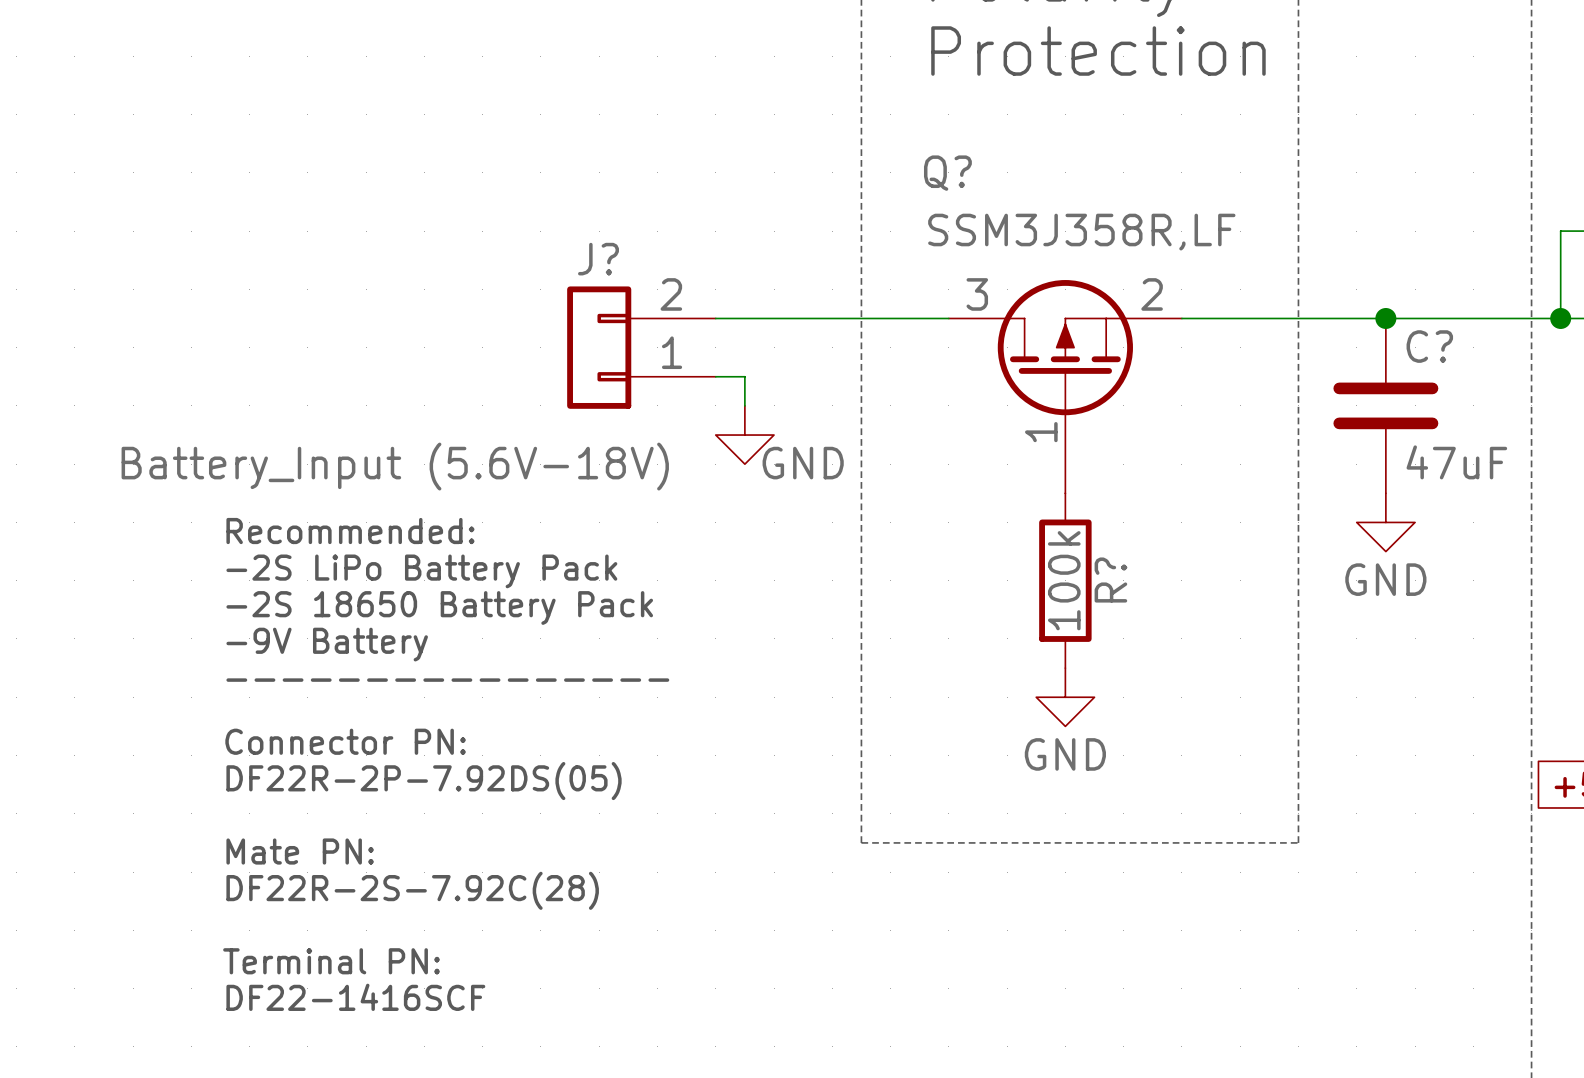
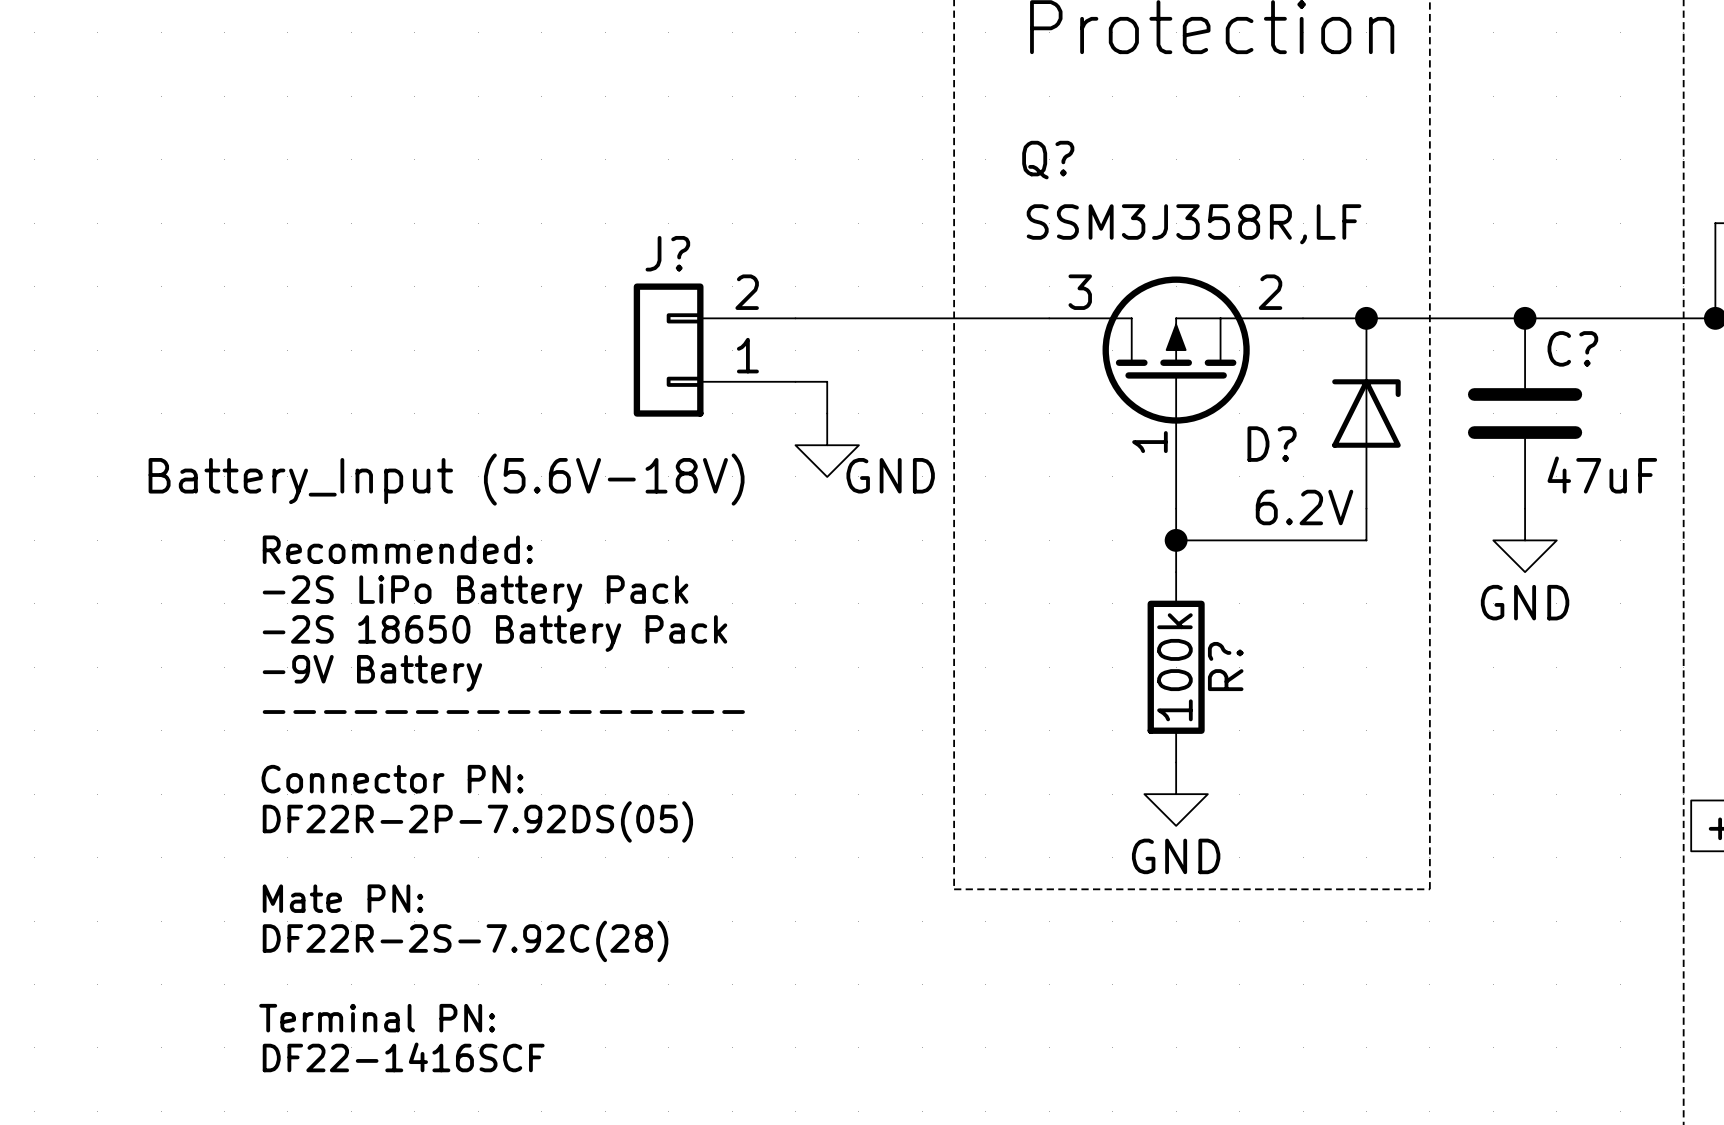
junction: none -> (1366, 318)
D?: none -> 6.2V (1366, 413)
wire: none -> (1366, 508) (1366, 540) (1176, 540)
junction: none -> (1176, 540)
R? position: (1065, 580) -> (1176, 667)
power symbol position: GND (1065, 697) -> GND (1176, 794)

